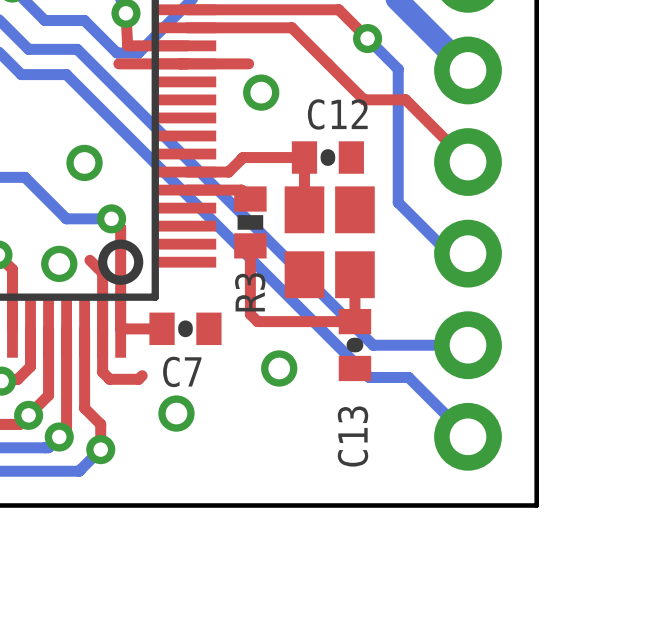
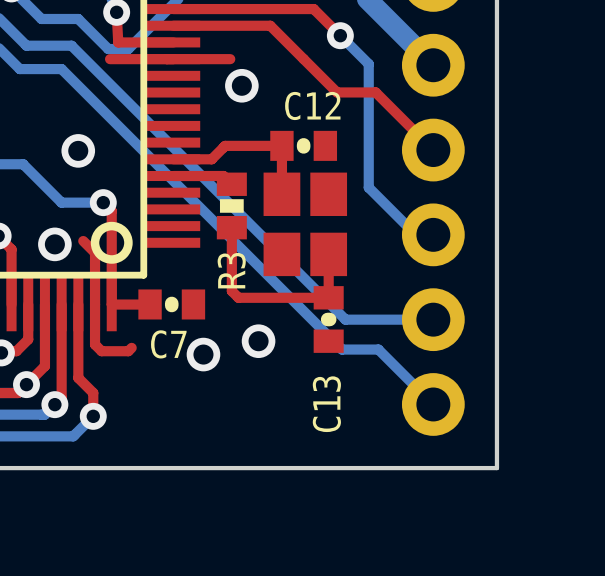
via position: (176, 413) -> (203, 354)

